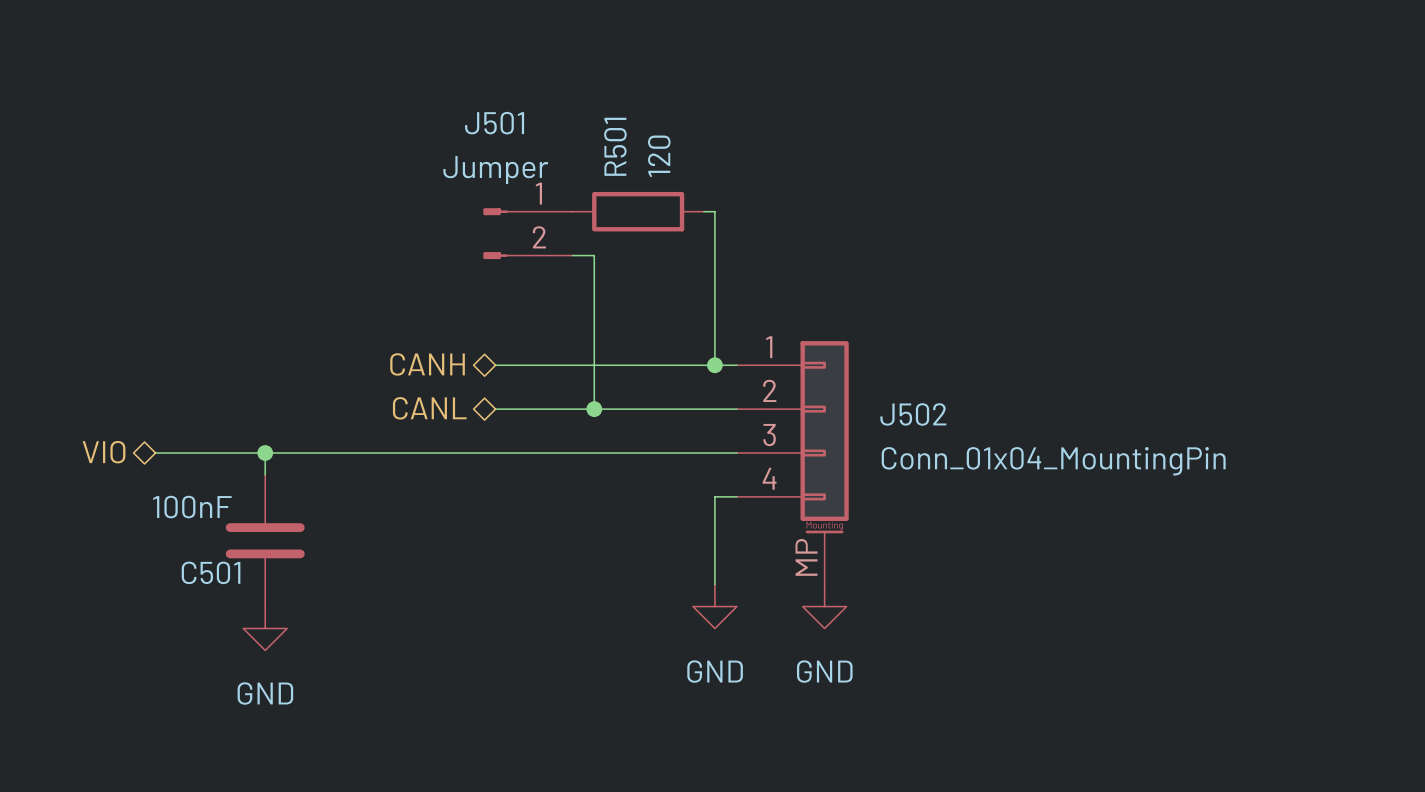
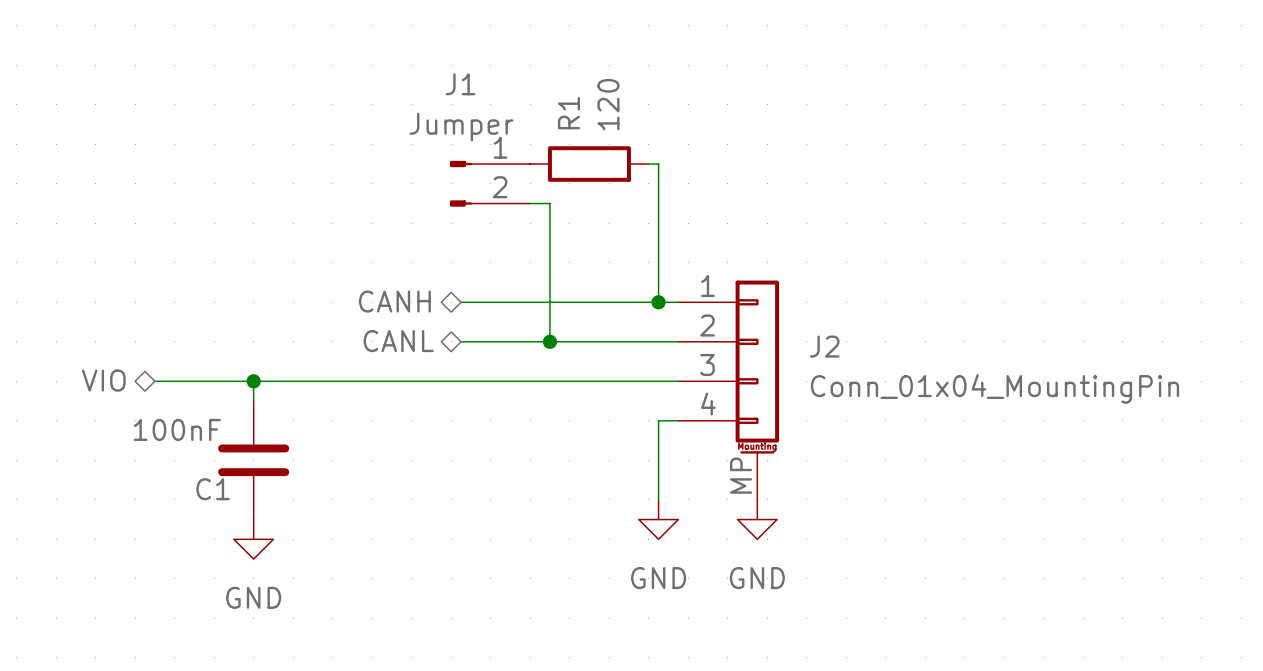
J501 name: J501 (494, 123) -> J1 (460, 84)
R501 name: R501 (615, 146) -> R1 (568, 113)
J502 name: J502 (913, 414) -> J2 (824, 346)
C501 name: C501 (211, 572) -> C1 (213, 489)

